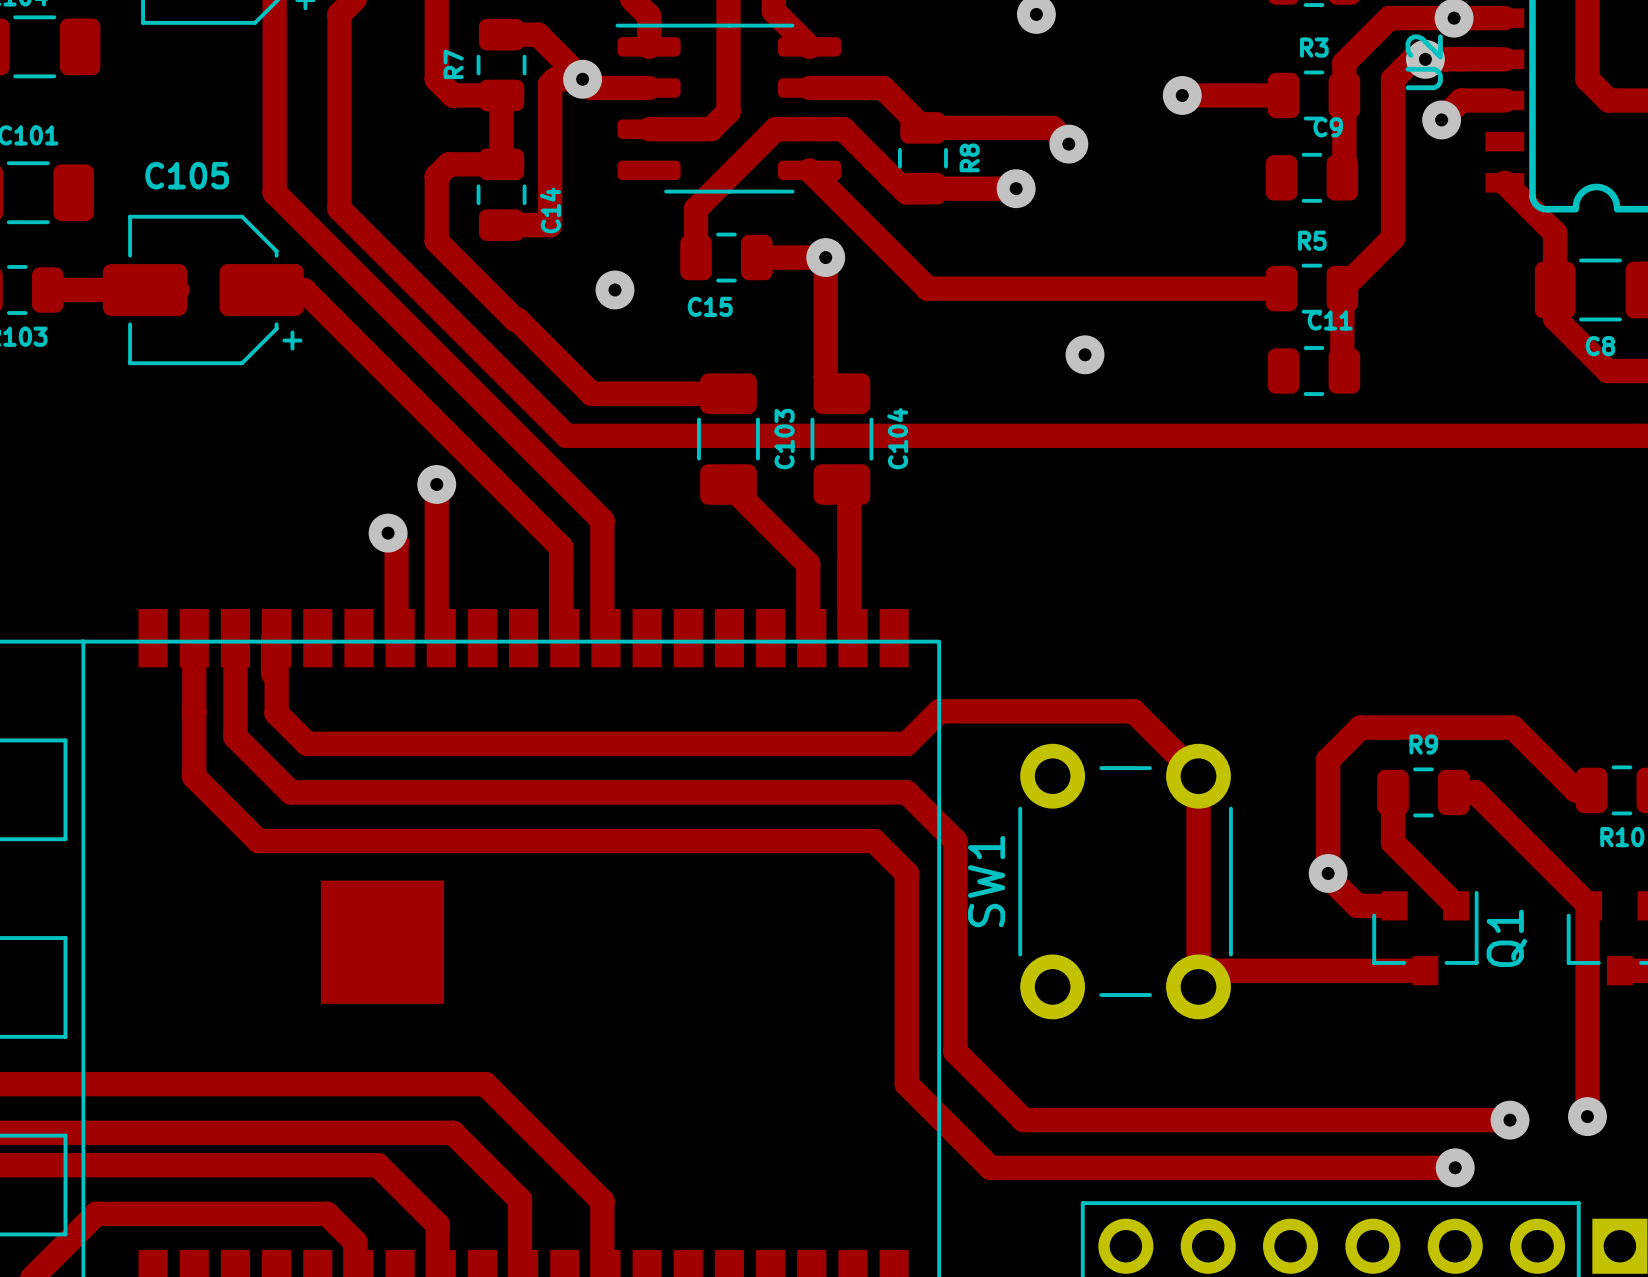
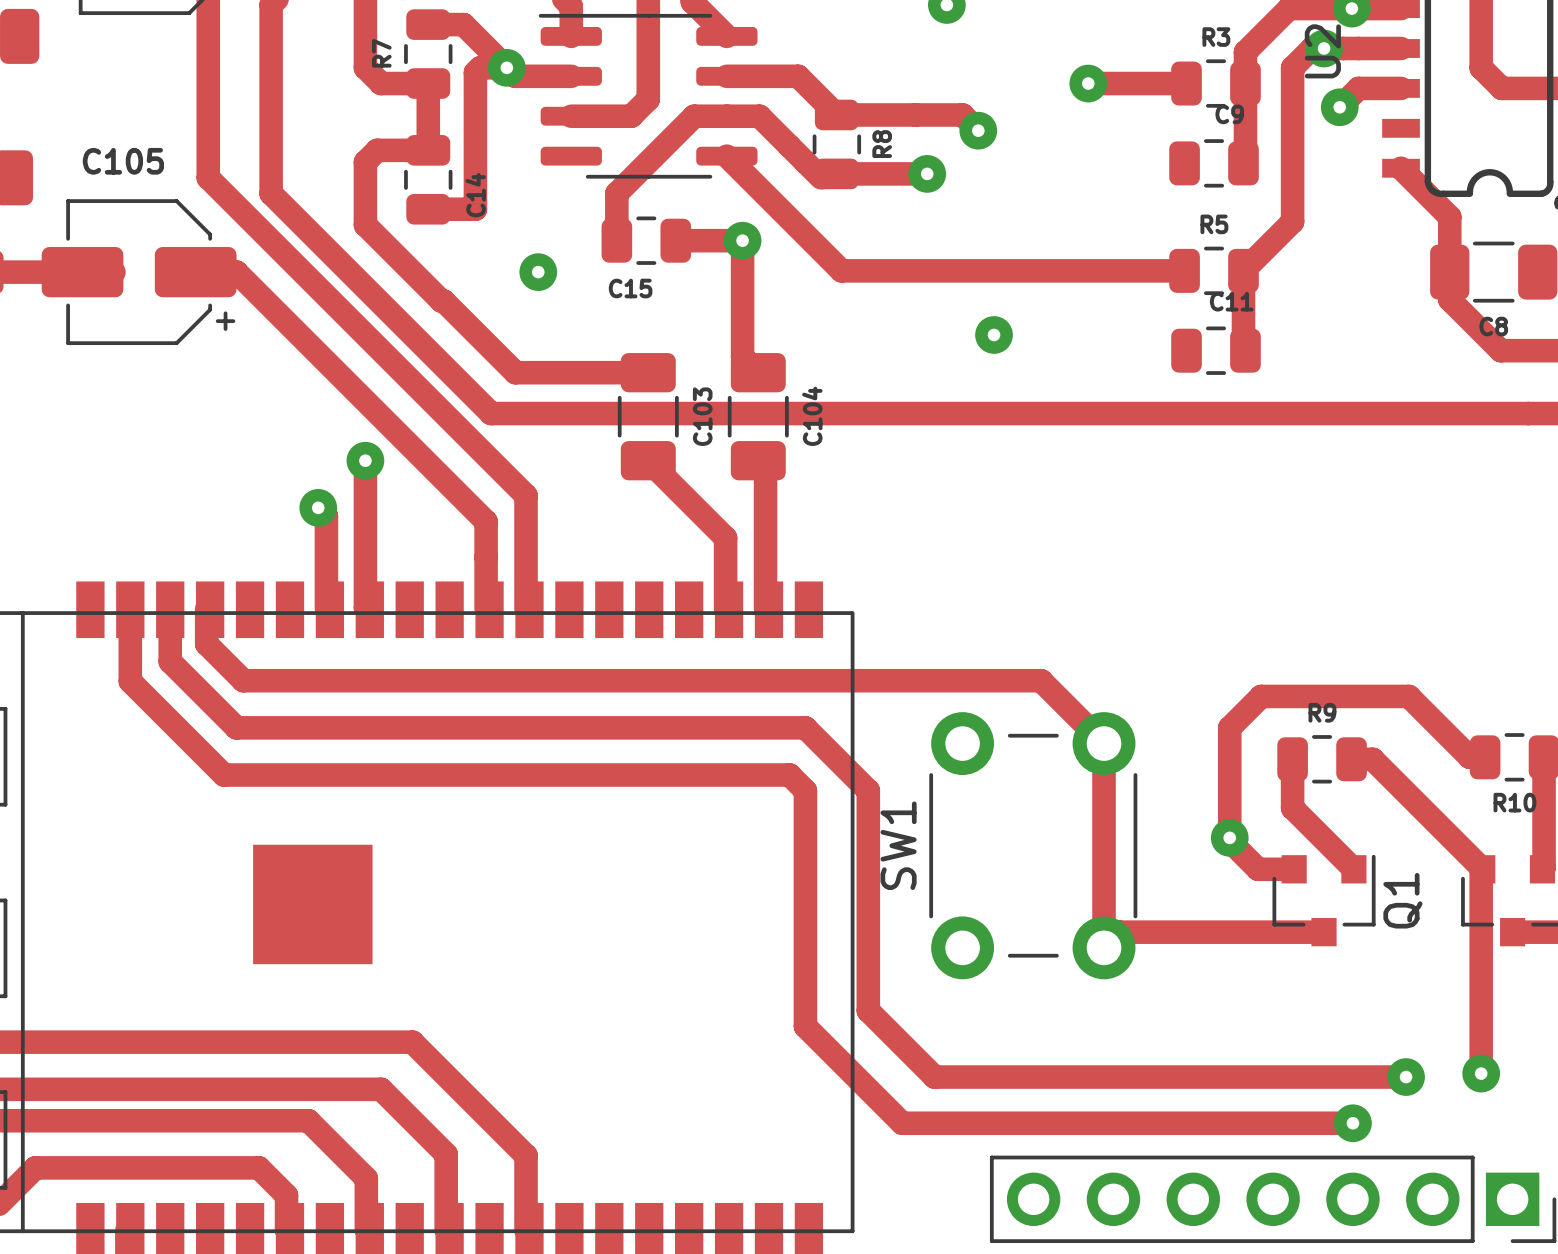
track: (276, 638) (276, 713) (307, 743) (906, 743) (939, 711) -> (206, 644) (243, 680) (852, 680)
track: (235, 691) (235, 736) (290, 792) (906, 792) (955, 841) -> (170, 661) (236, 727) (805, 727) (868, 790) (868, 806)
track: (194, 712) (194, 776) (258, 841) (874, 841) (906, 873) (906, 1084) -> (130, 681) (223, 775) (789, 775) (805, 790) (805, 1026) (821, 1042)

